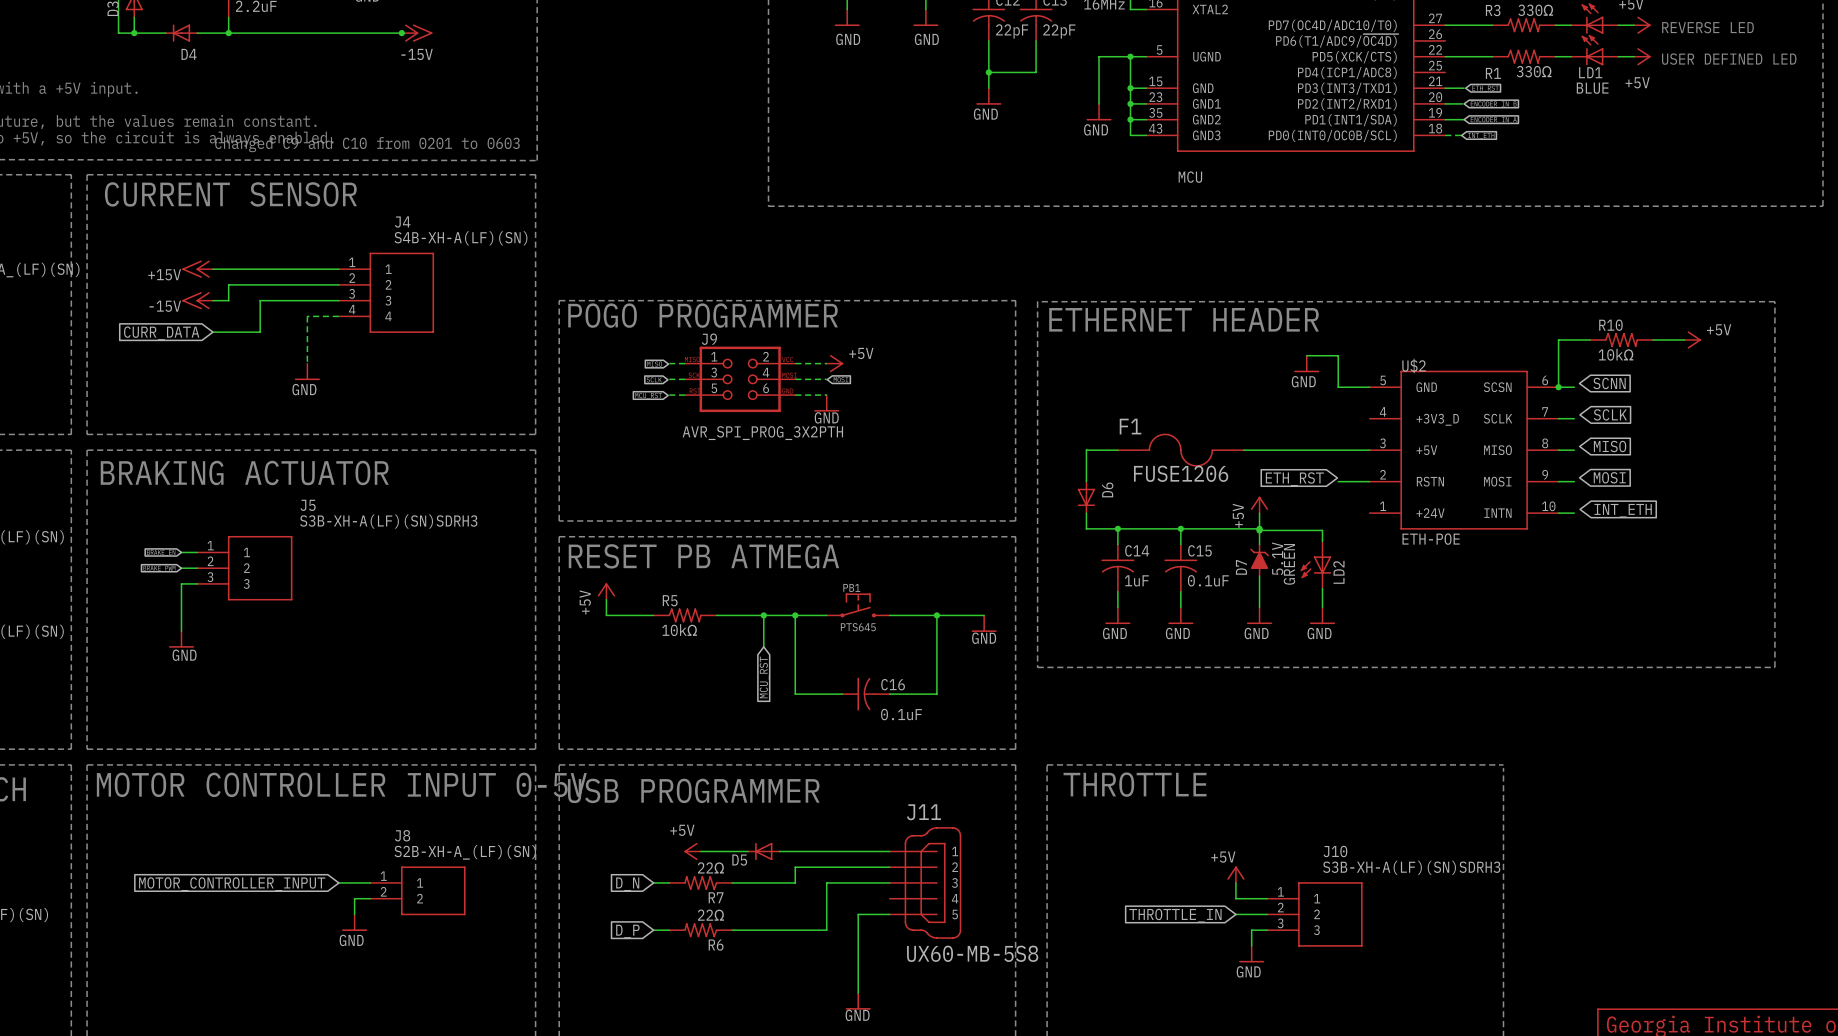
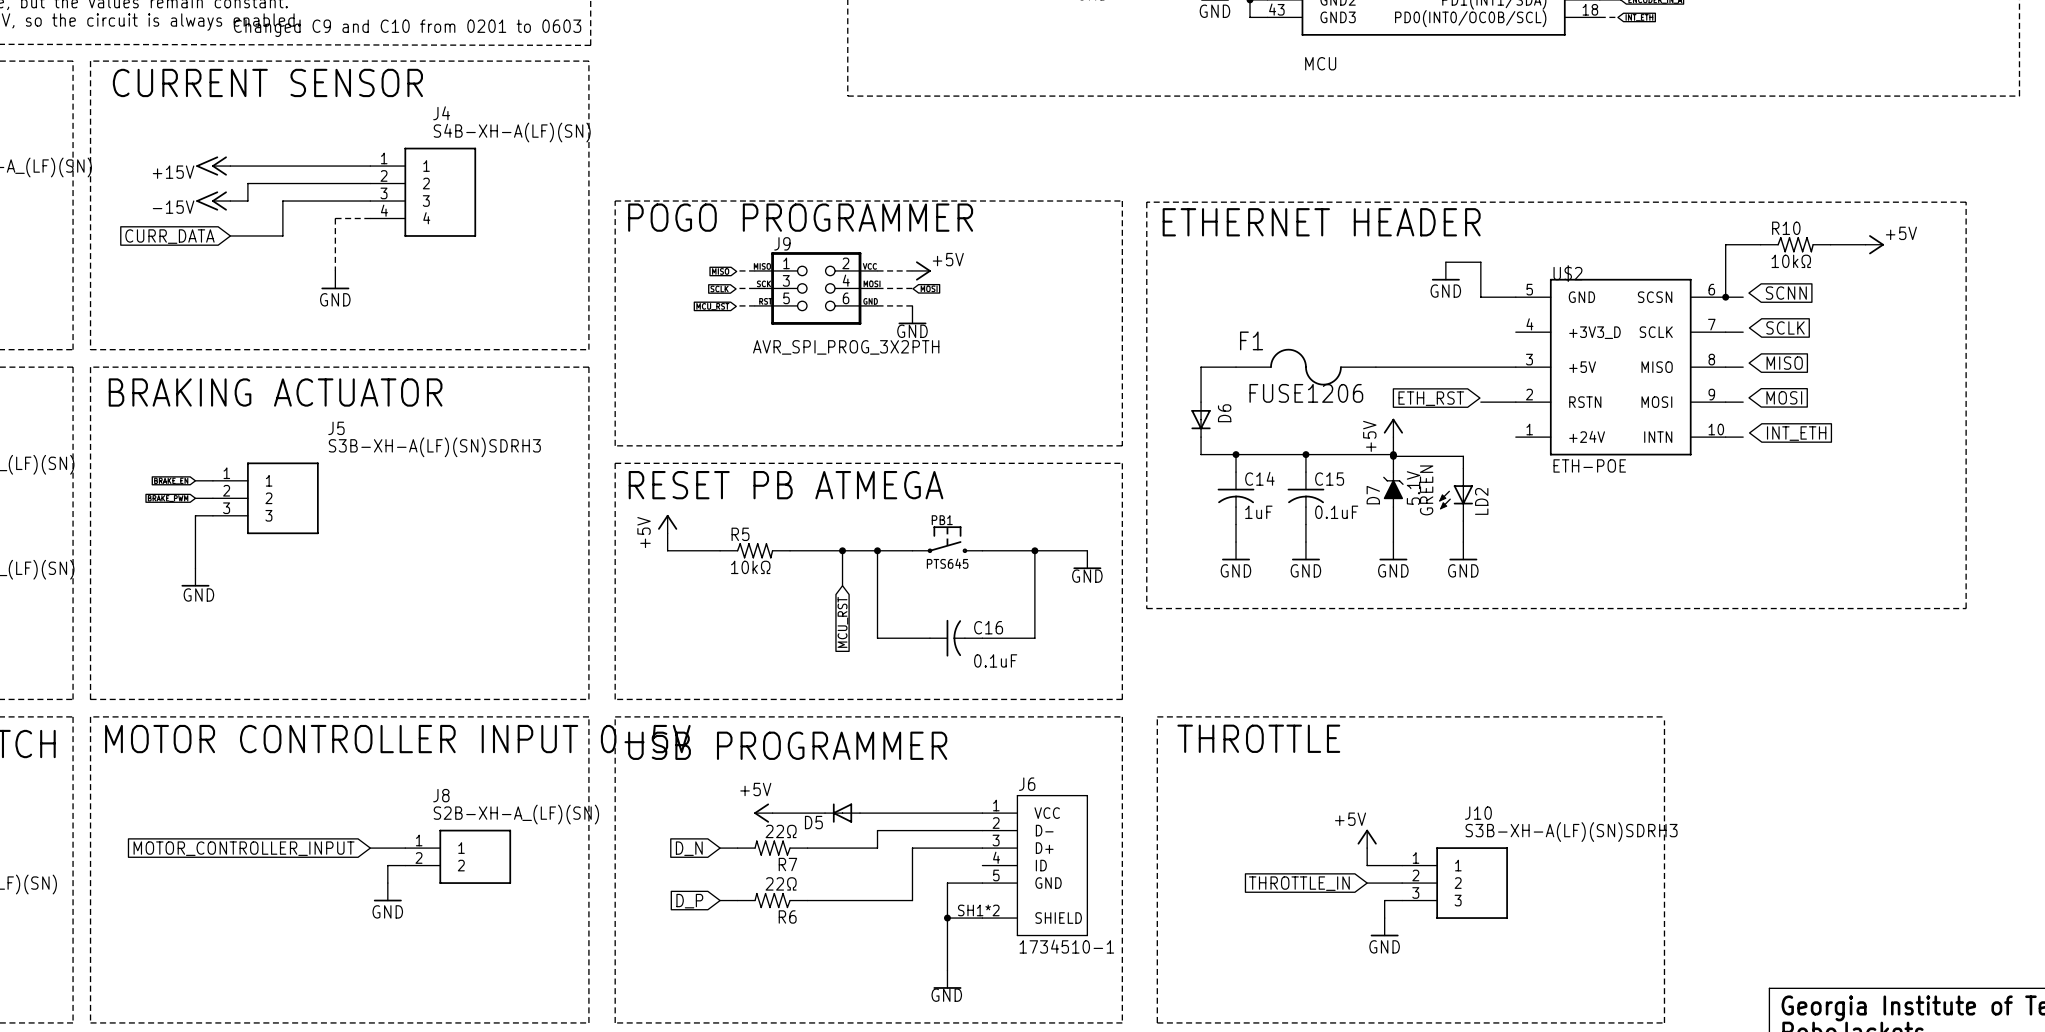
J11: UX60-MB-5S8 (925, 882) -> none
J6: none -> 1734510-1 (1035, 865)
wire: none -> (947, 918) (982, 918)
junction: none -> (947, 918)

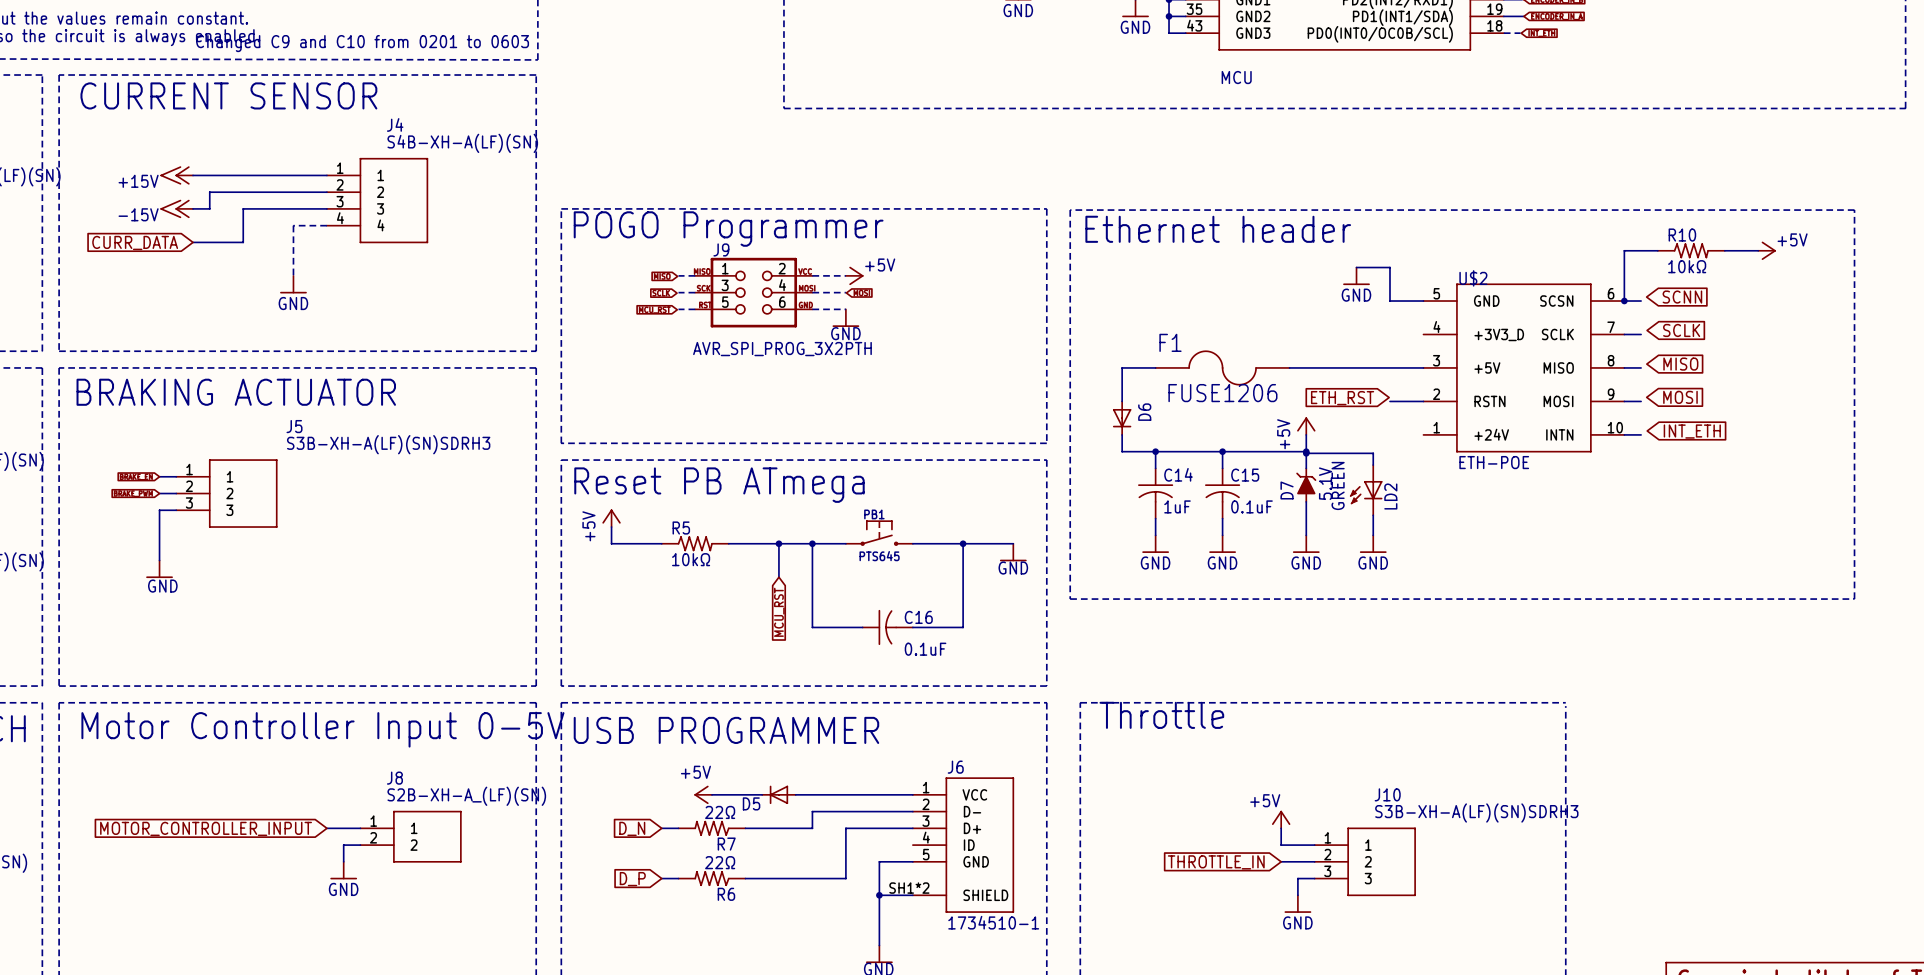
text: POGO PROGRAMMER (800, 217) -> POGO Programmer (728, 229)
text: ETHERNET HEADER (1321, 222) -> Ethernet header (1218, 229)
text: RESET PB ATMEGA (786, 485) -> Reset PB ATmega (719, 485)
text: none -> Throttle (1161, 715)
text: THROTTLE (1258, 738) -> none
text: MOTOR CONTROLLER INPUT 0-5V (397, 739) -> none
text: none -> Motor Controller Input 0-5V (322, 729)

